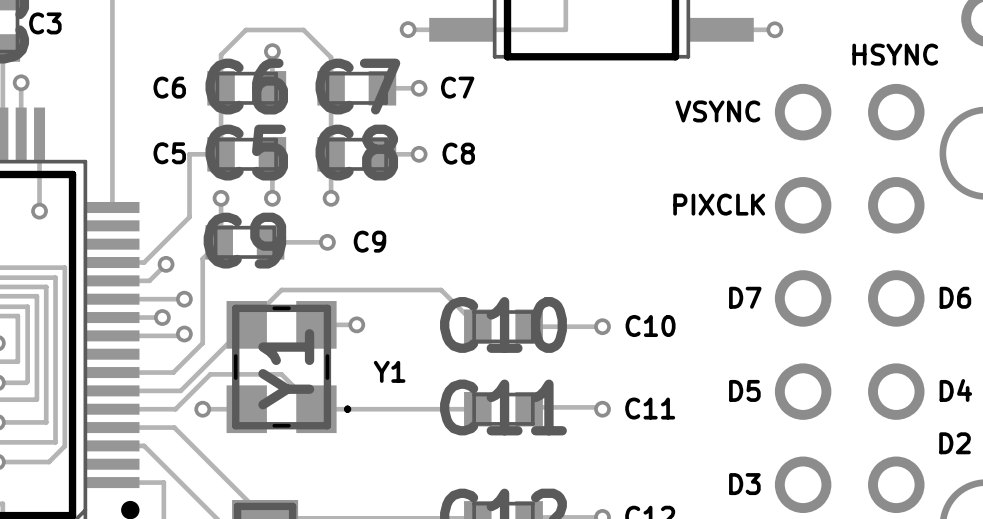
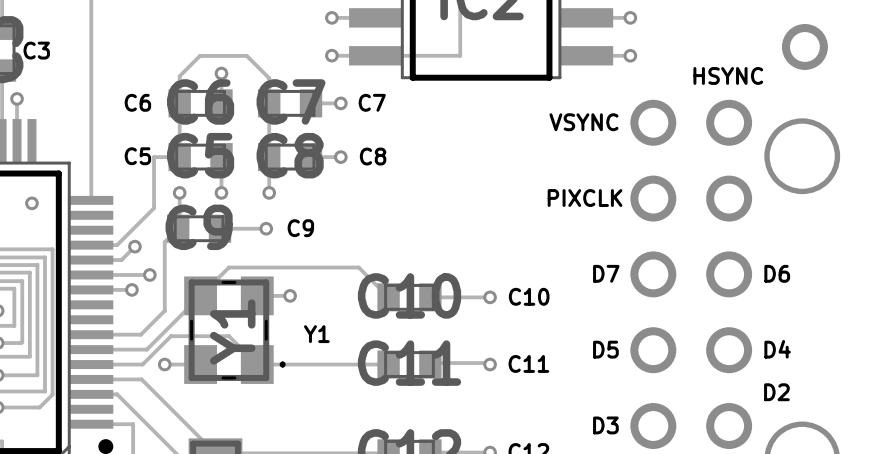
track: (39, 134) (39, 211) -> none
track: (184, 334) (182, 335) (112, 335) -> none
via: (184, 334) -> none

